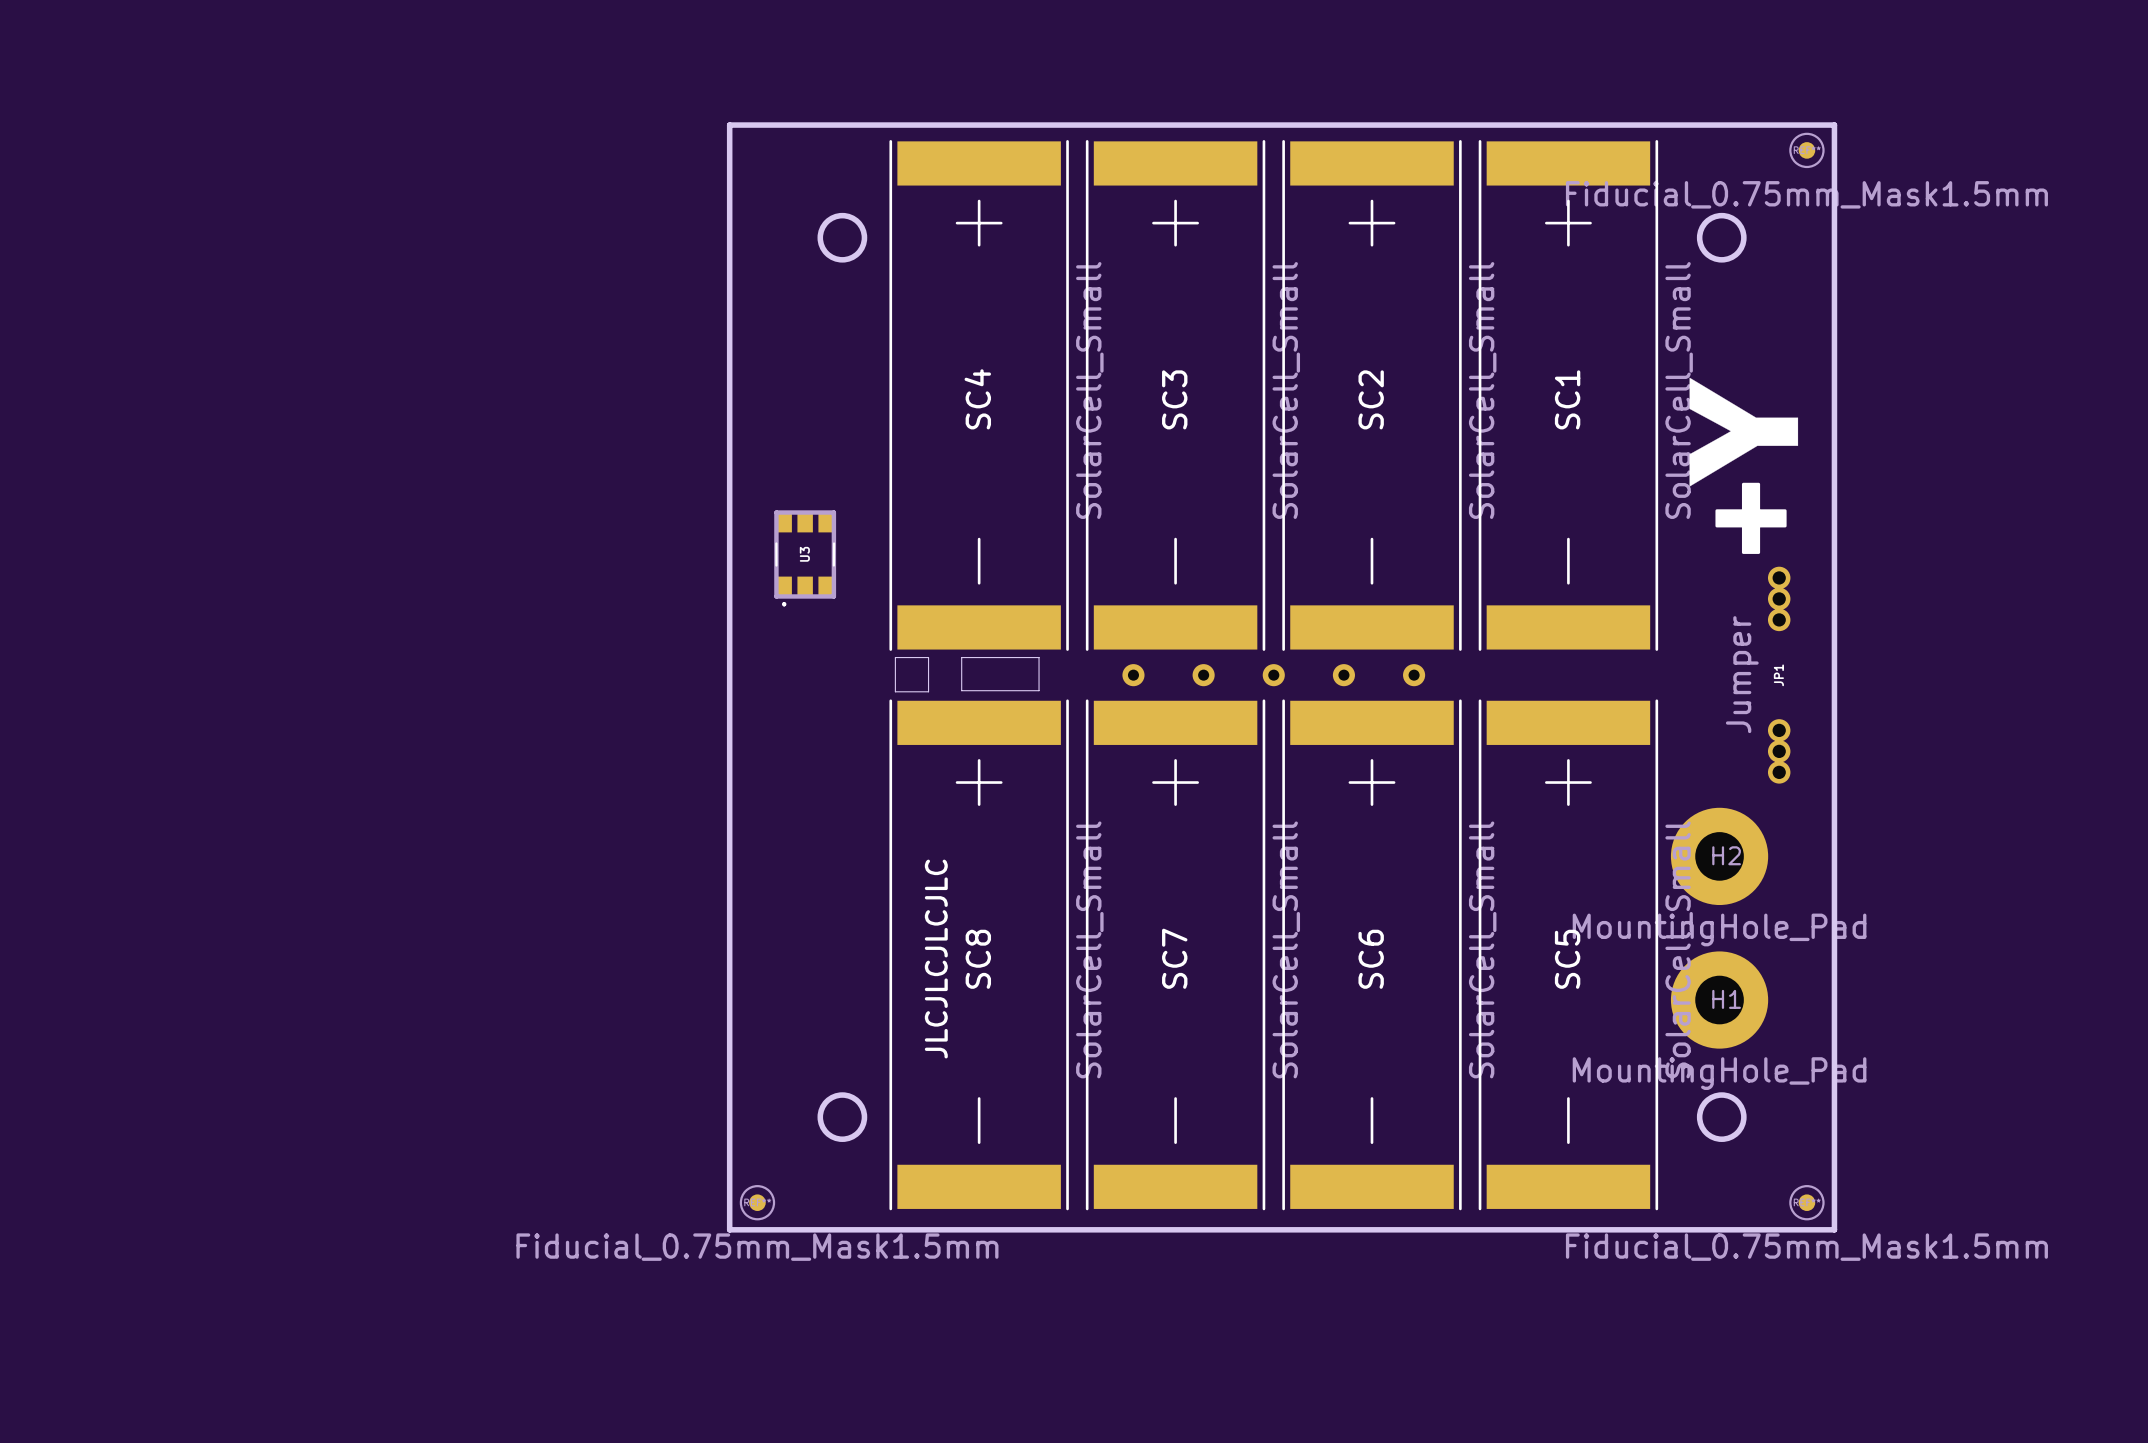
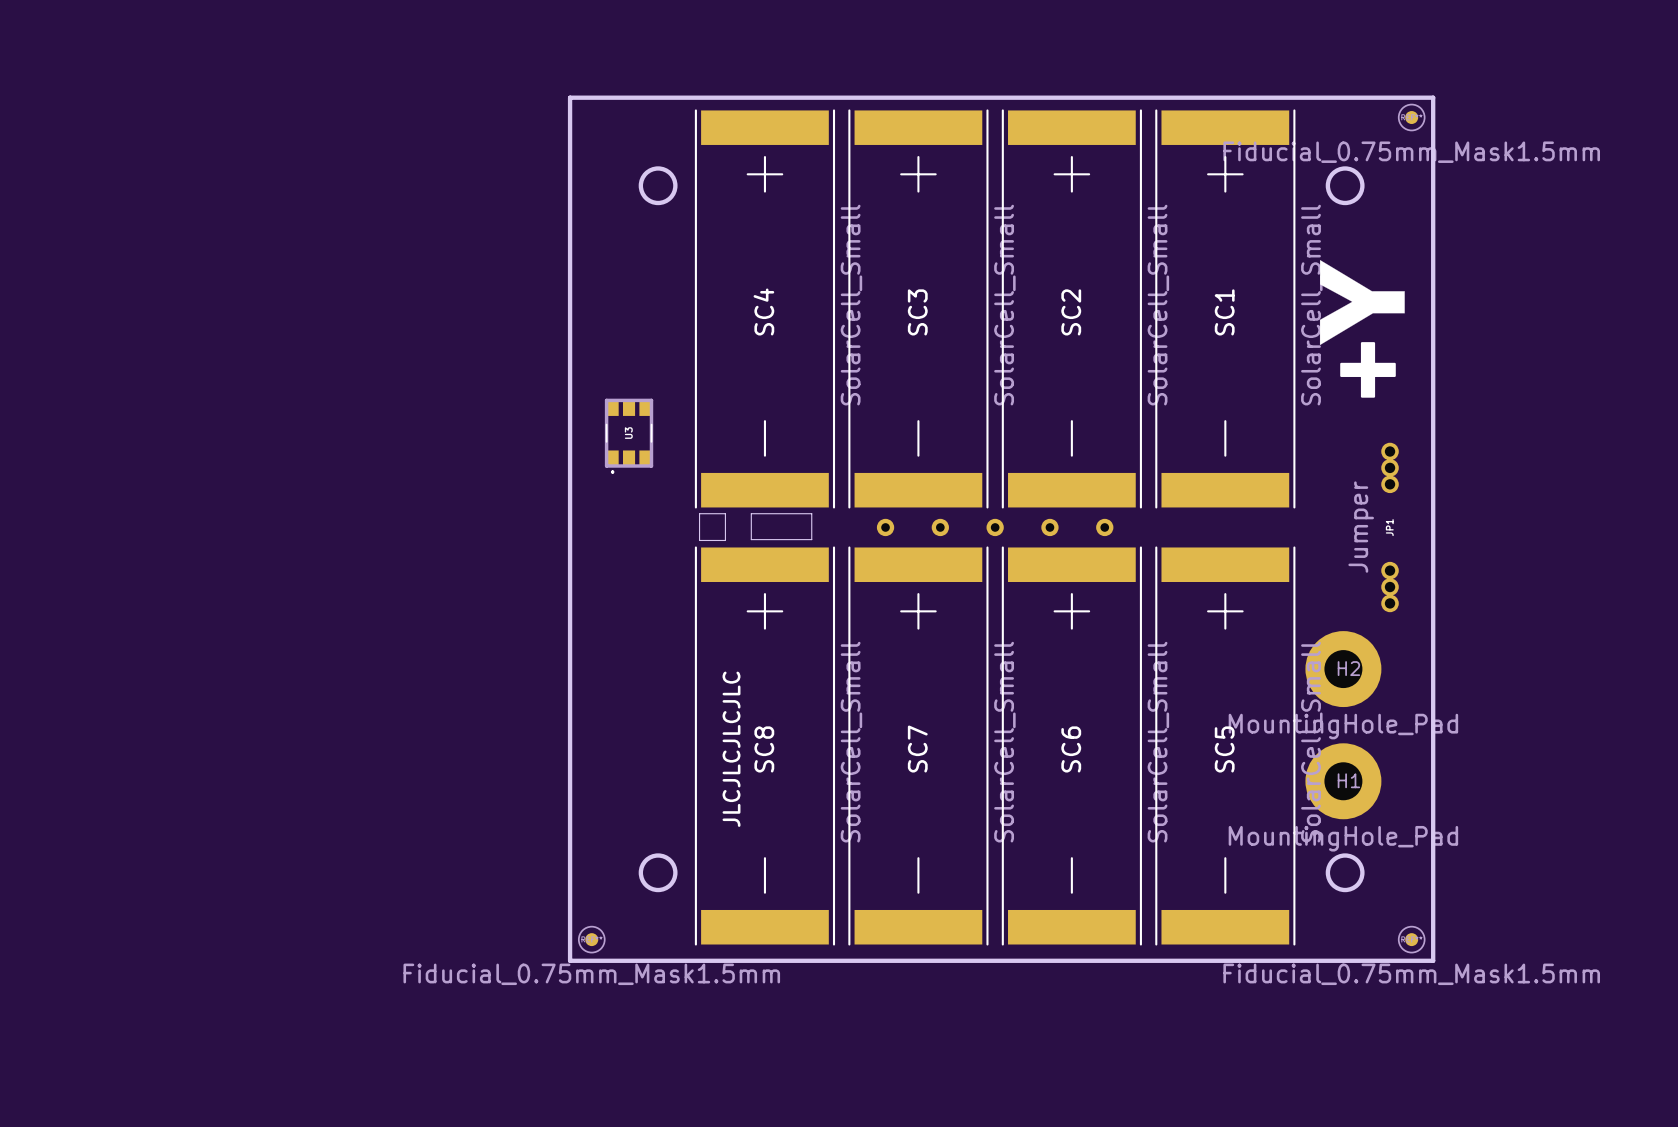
drawing position: (1743, 465) -> (1362, 328)

